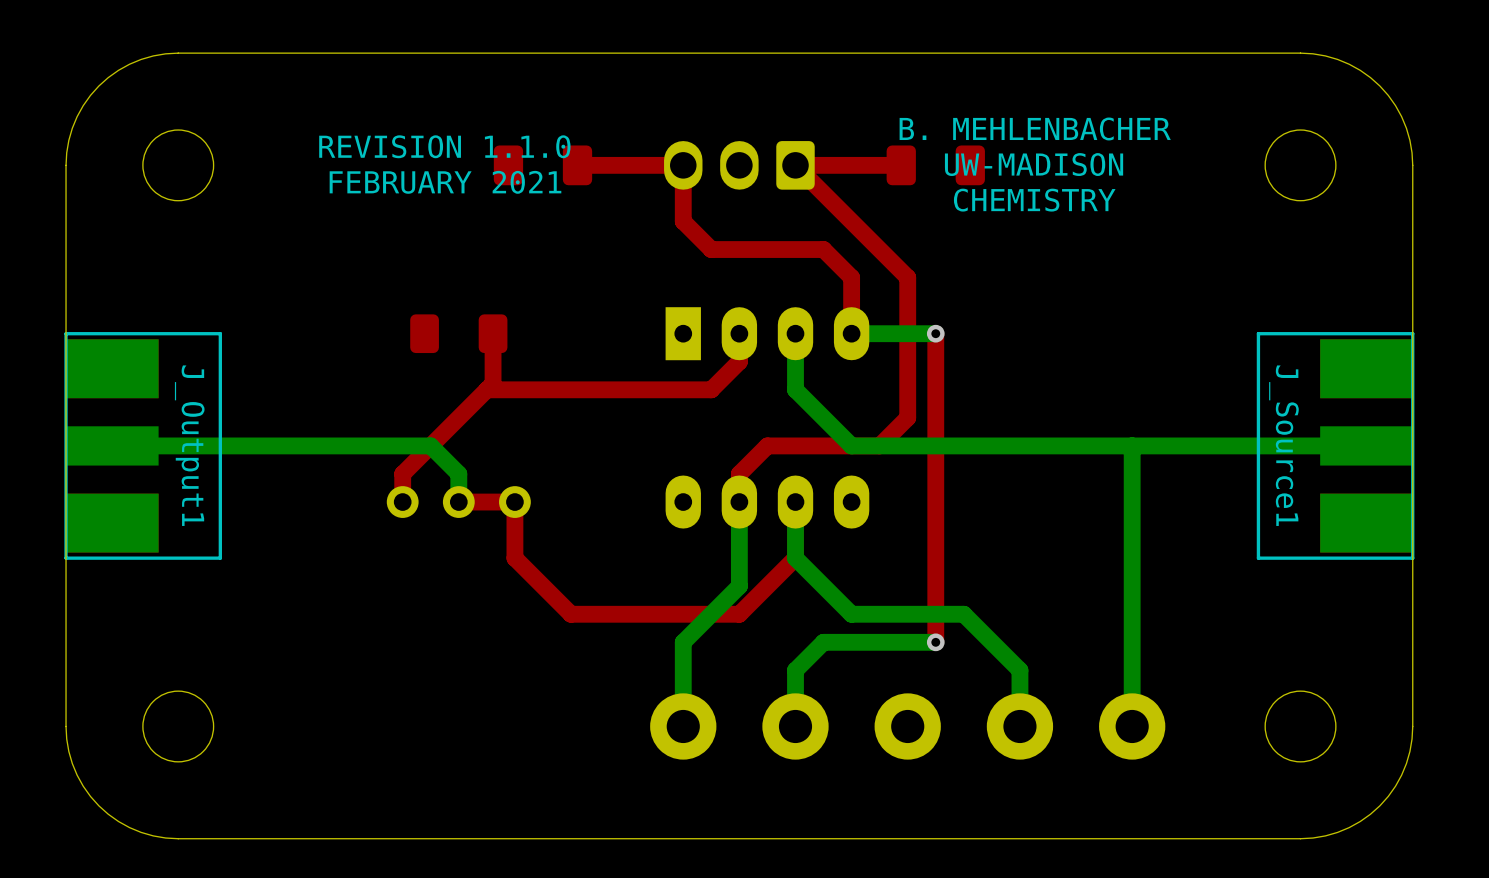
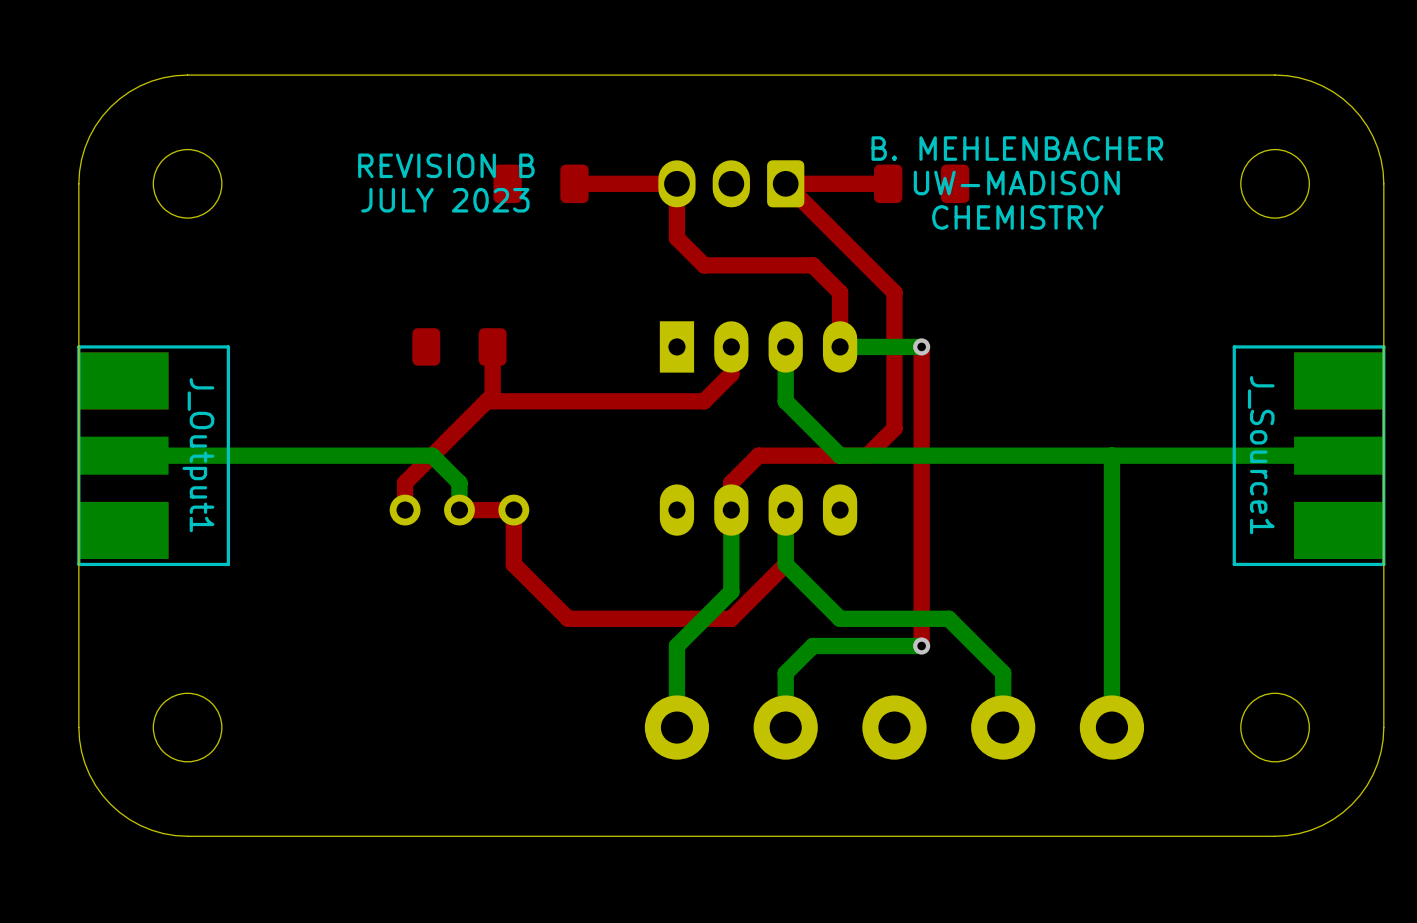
text: REVISION 1.1.0 (444, 146) -> REVISION B (446, 165)
text: FEBRUARY 2021 (445, 182) -> JULY 2023 (445, 200)

